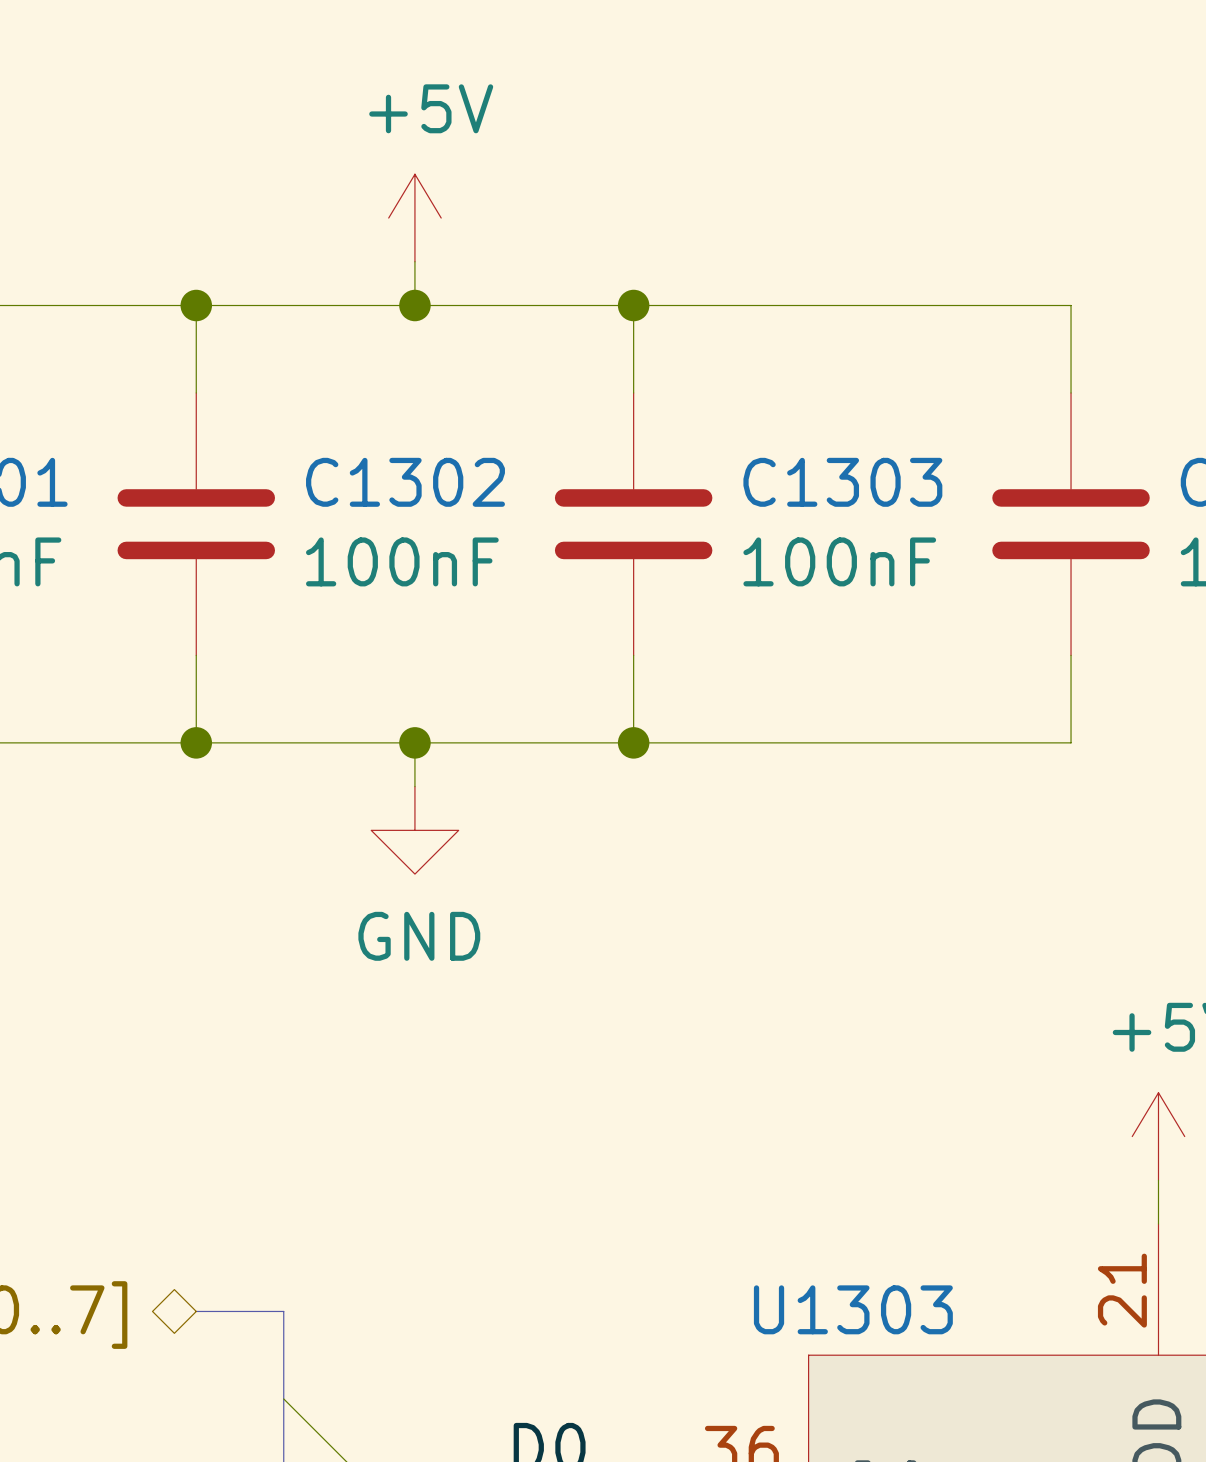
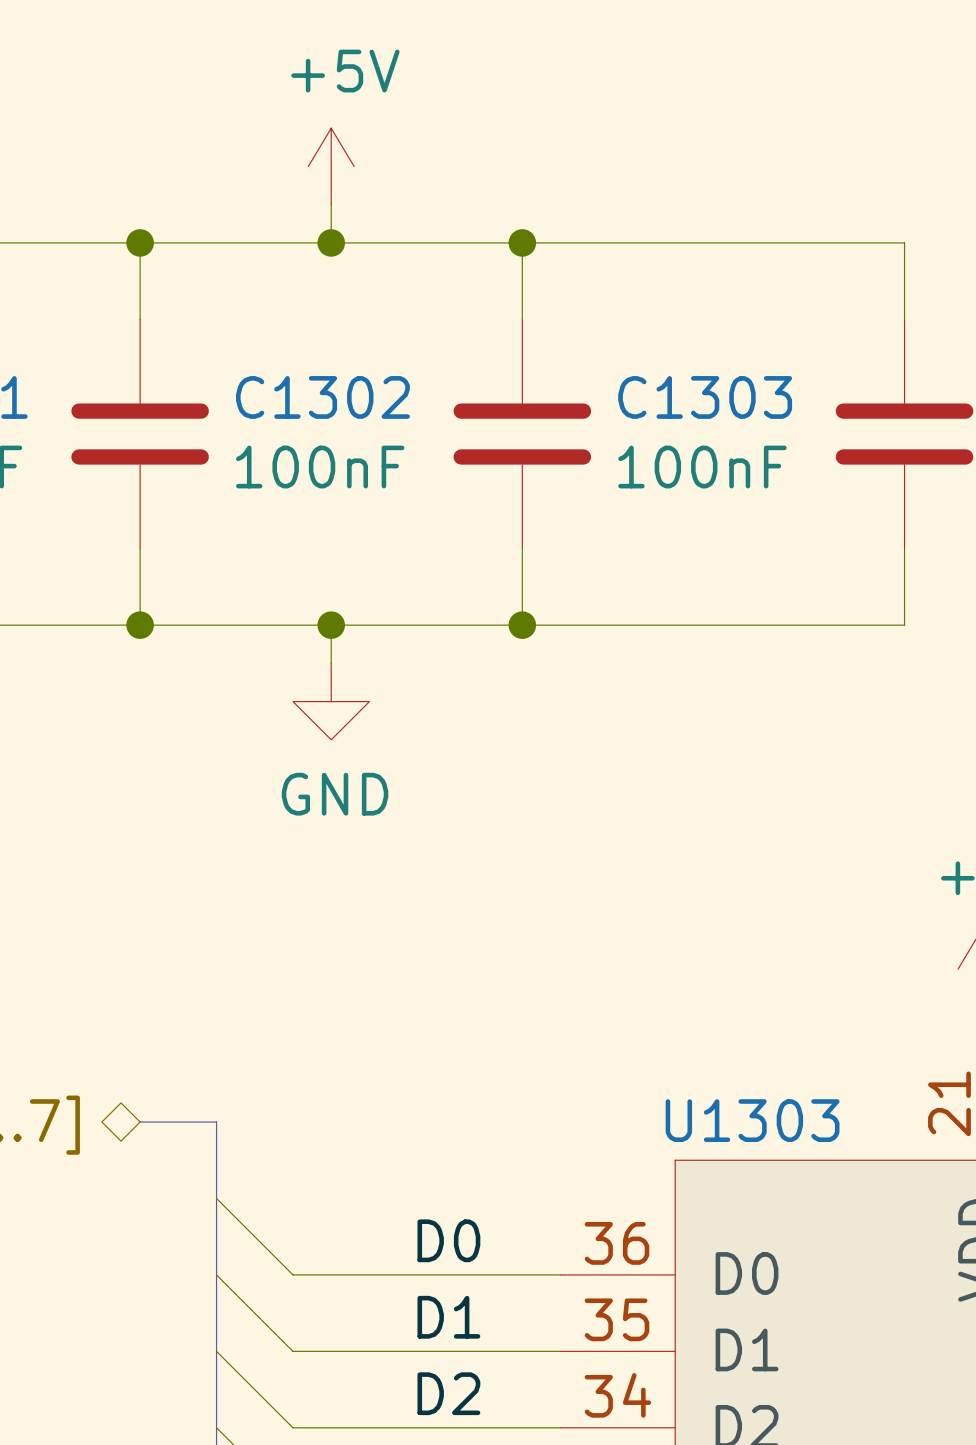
U1303 name position: U1303 (853, 1309) -> U1303 (752, 1120)

